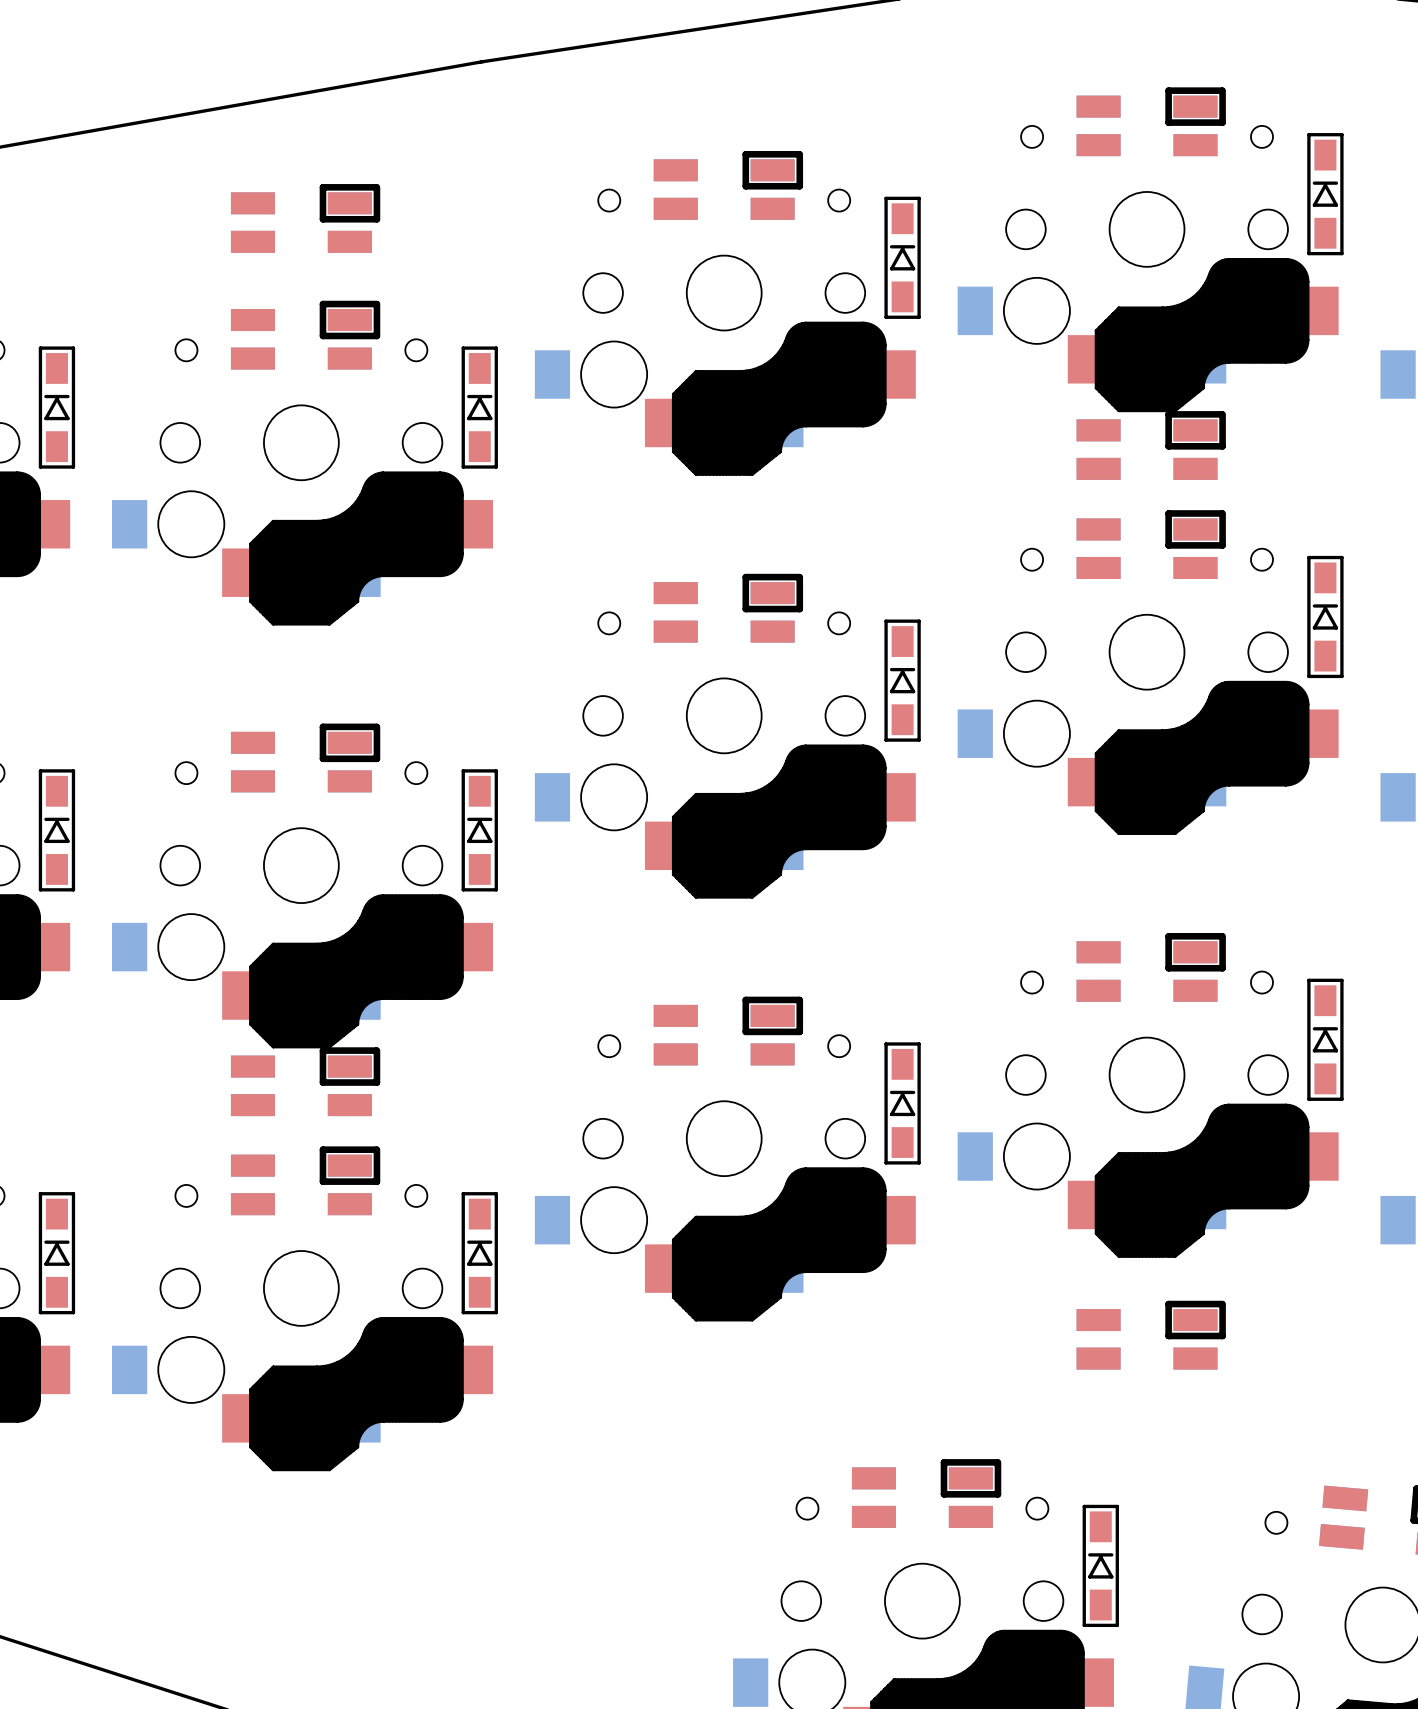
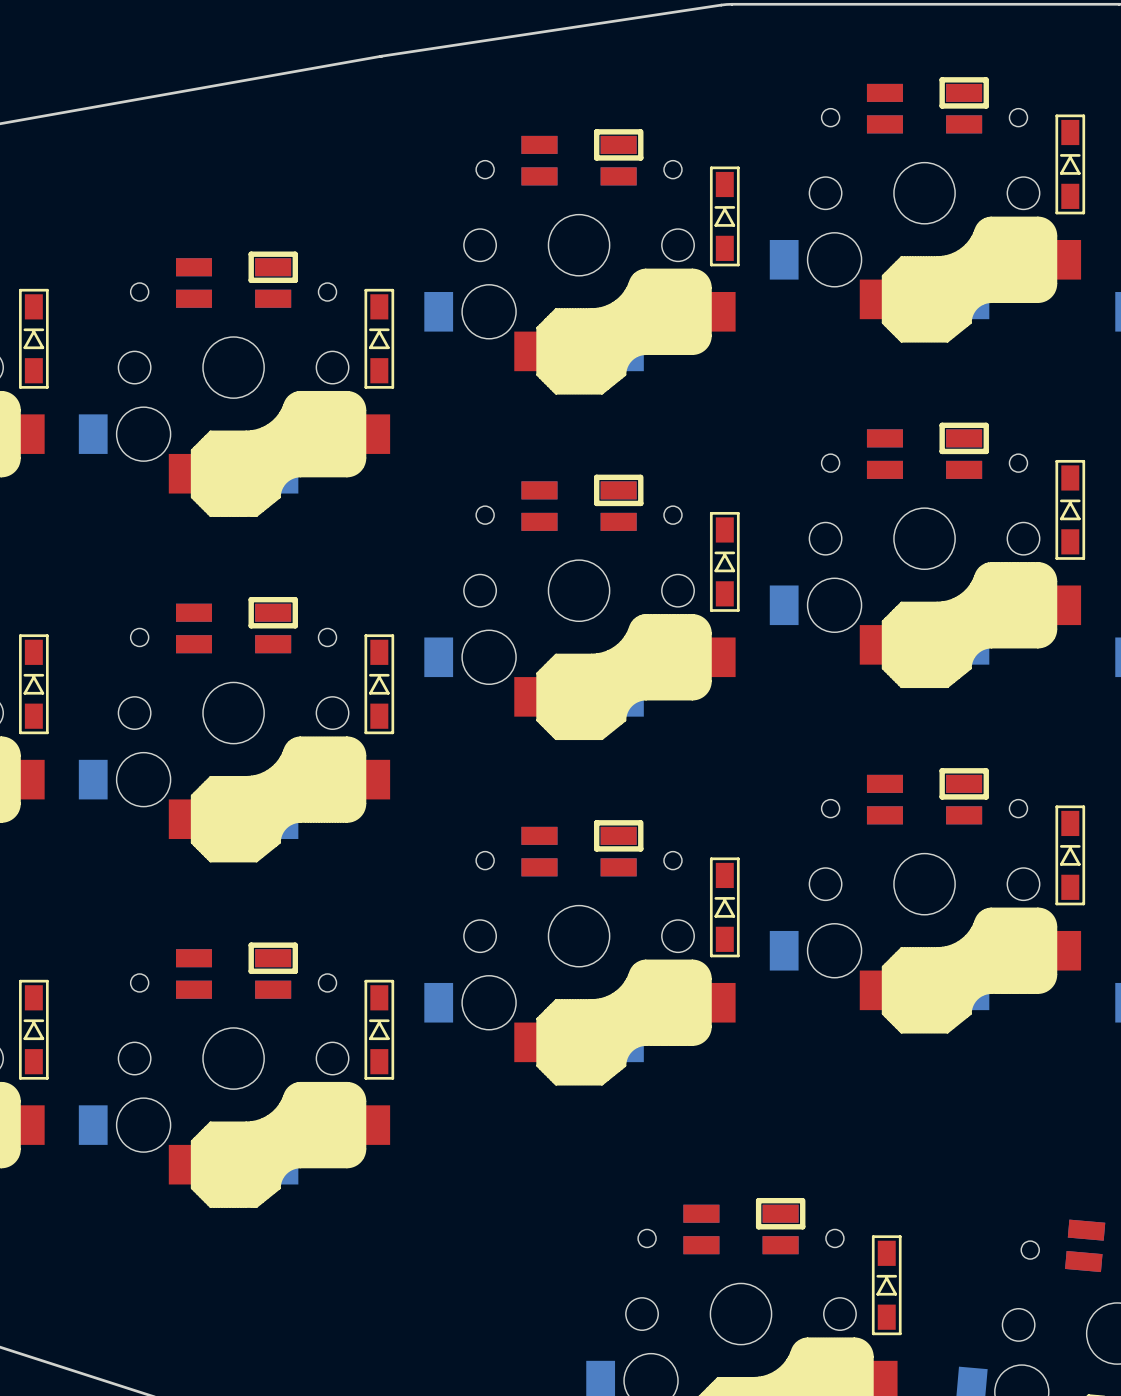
part: (305, 218) -> none
part: (1151, 445) -> none
part: (305, 1081) -> none
part: (1151, 1335) -> none

